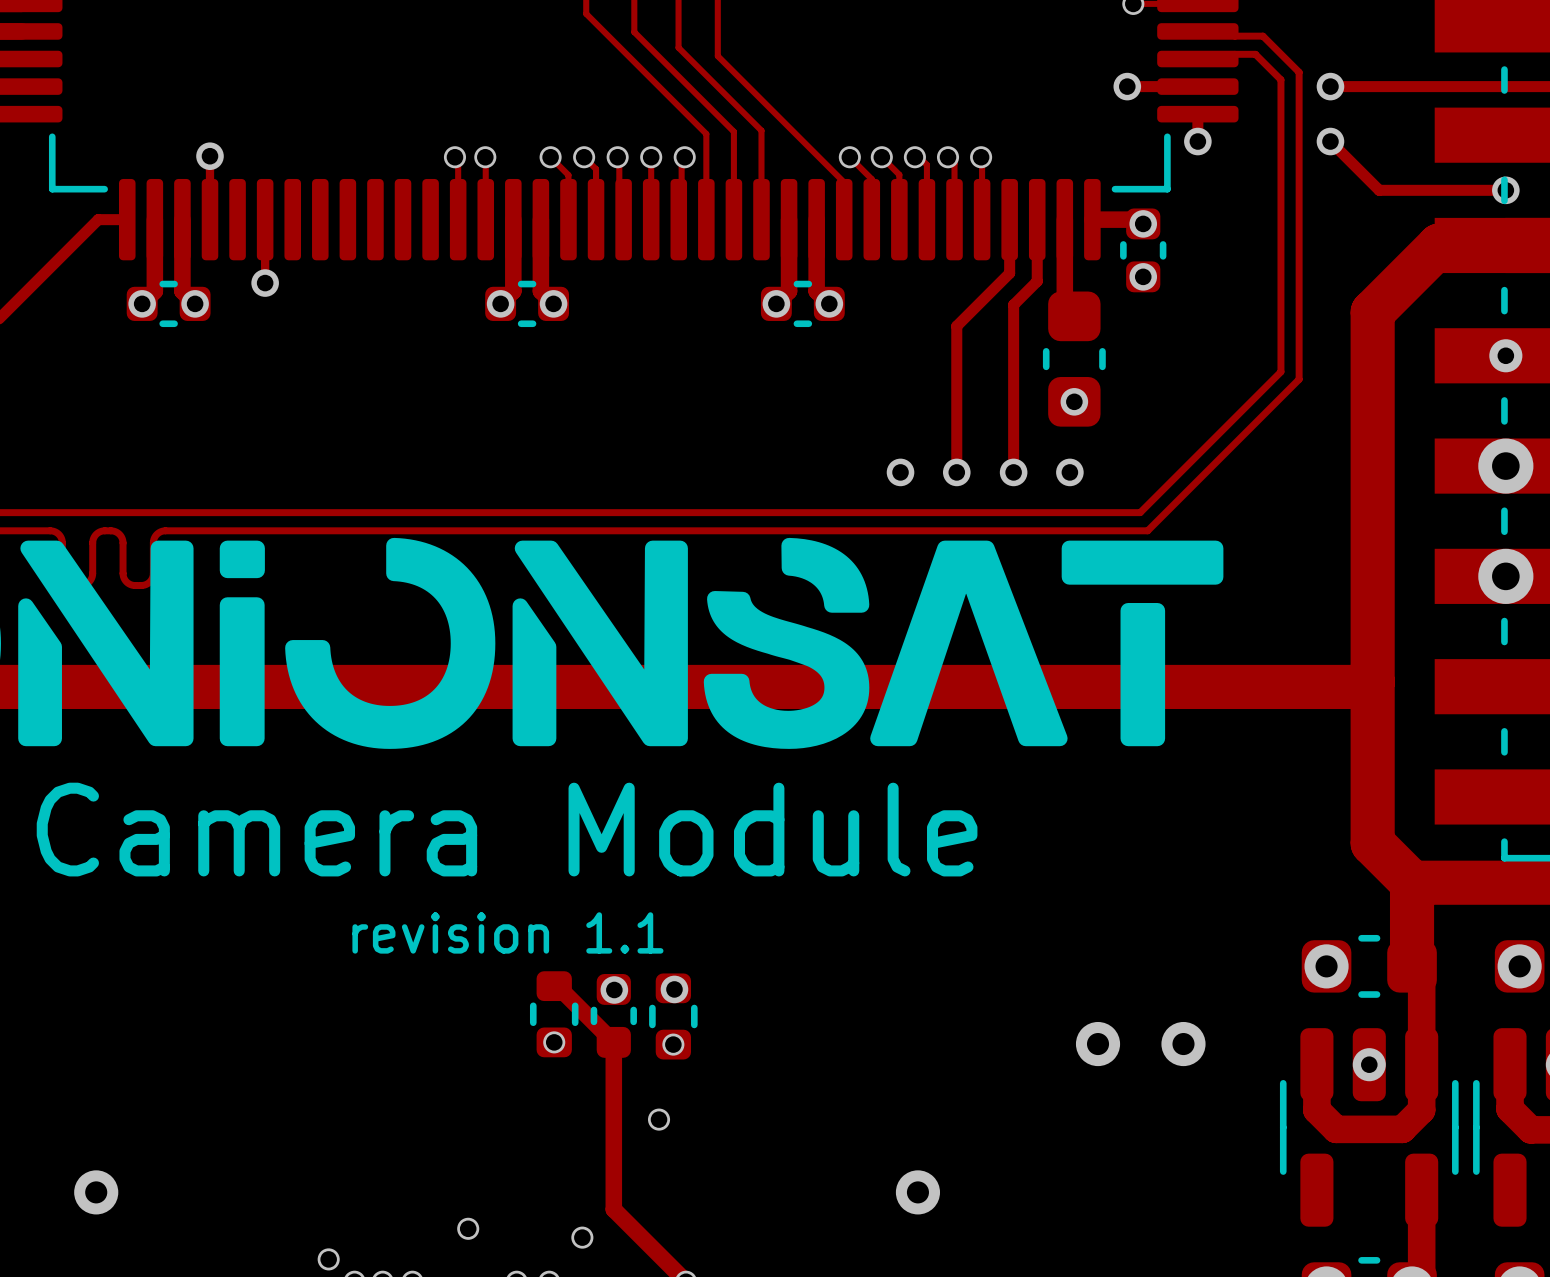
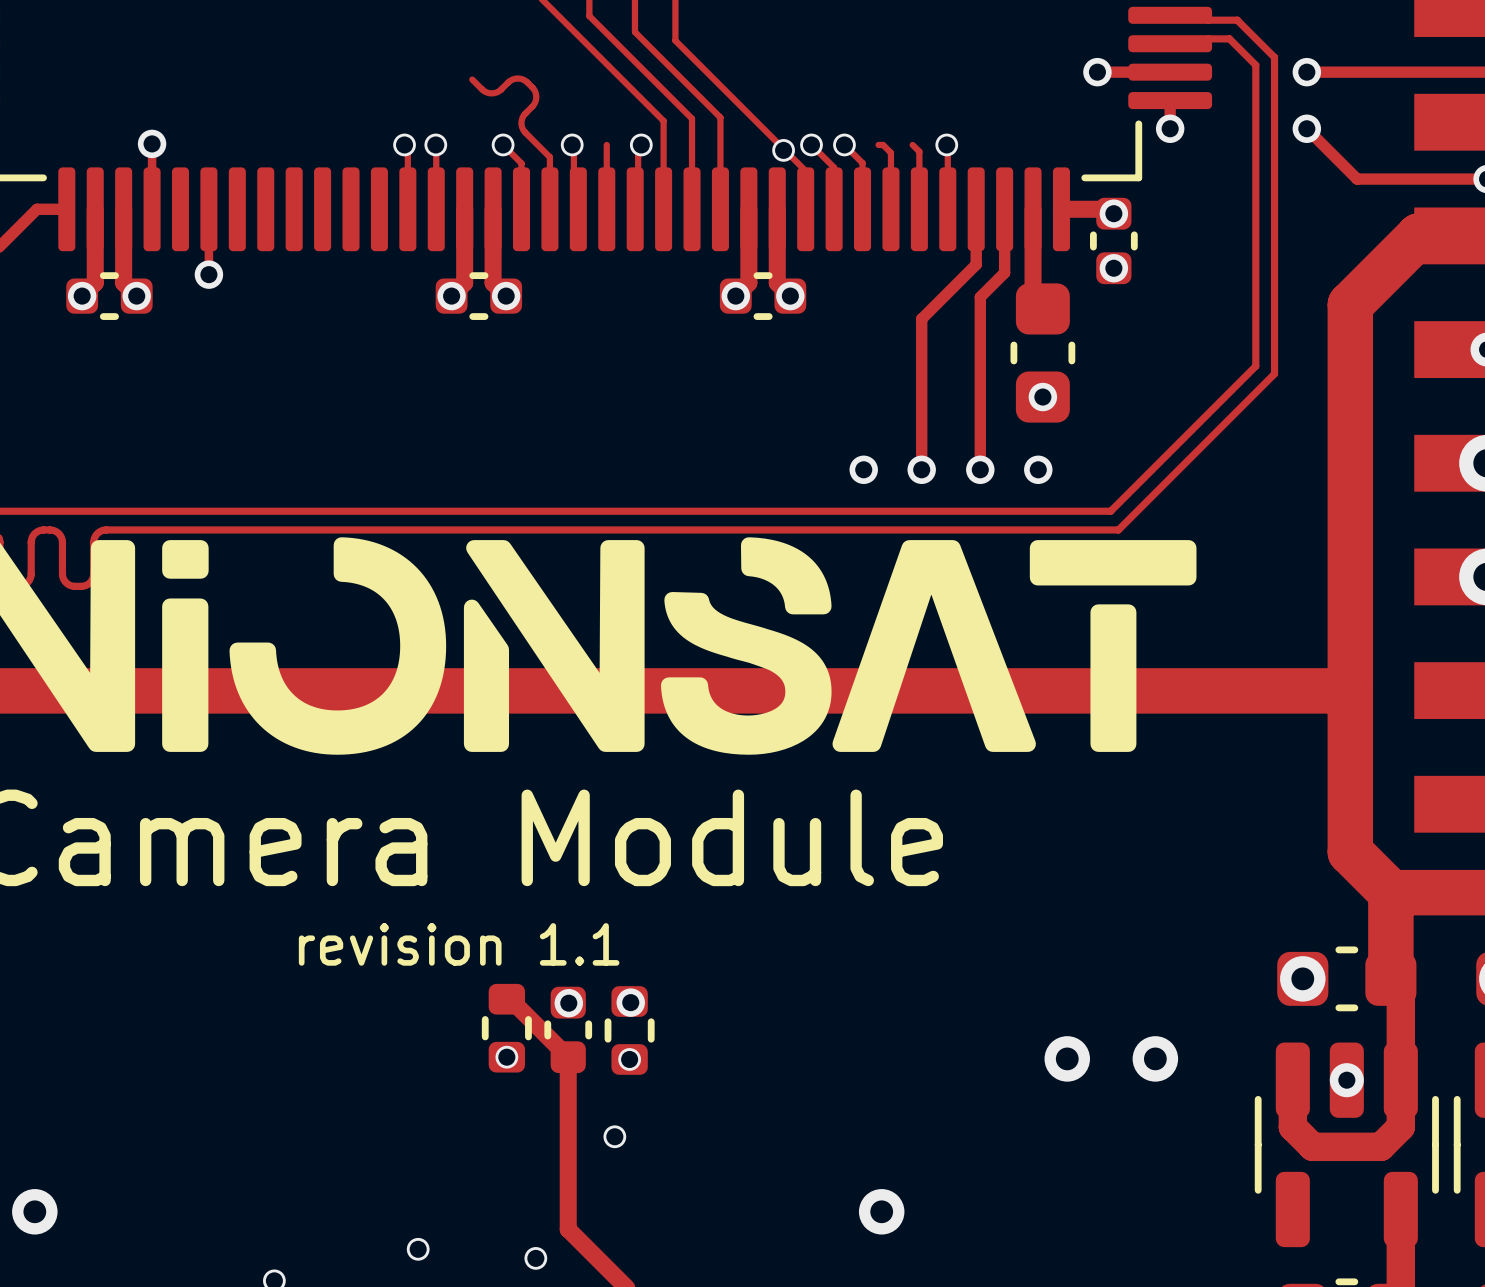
track: none -> (472, 79) (484, 91) (491, 93) (498, 91) (513, 79) (520, 78) (527, 82) (534, 91) (536, 98) (533, 105) (523, 115) (521, 124) (524, 131) (537, 144)
via: (584, 157) -> none
via: (651, 157) -> none
via: (914, 157) -> none
via: (948, 157) -> none
via: none -> (783, 150)

